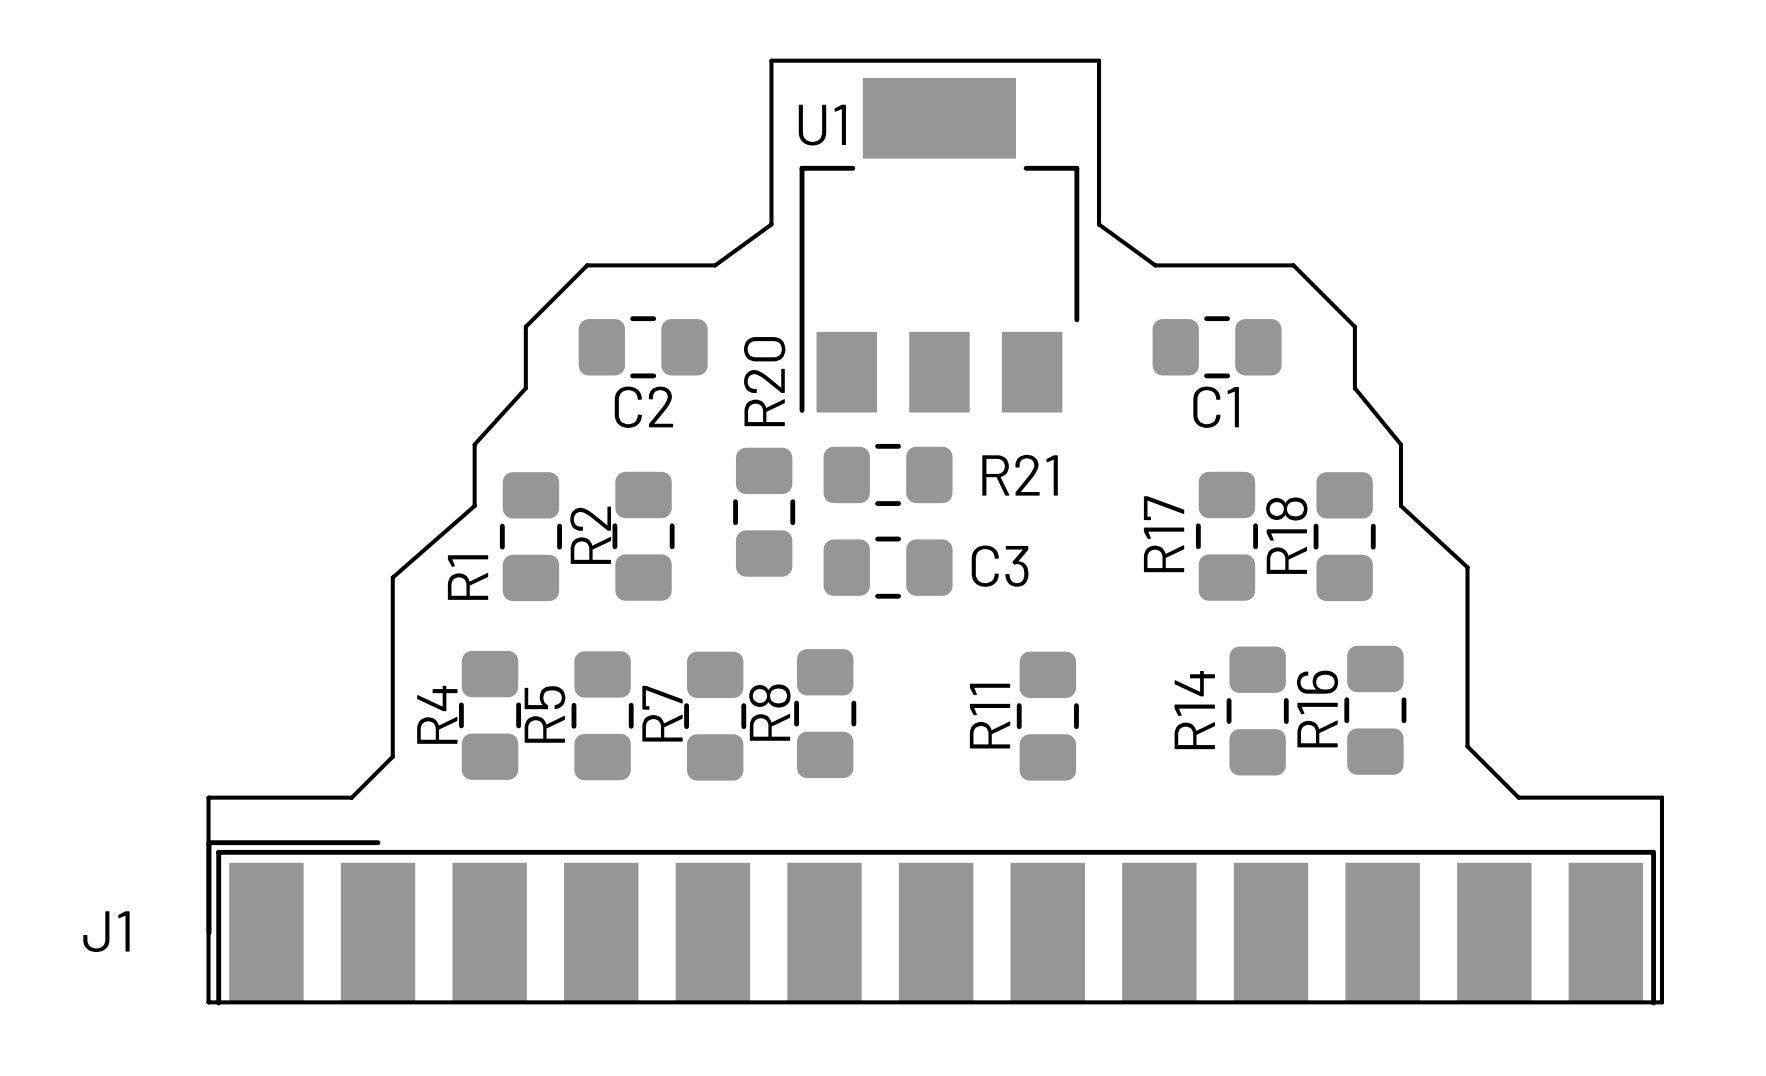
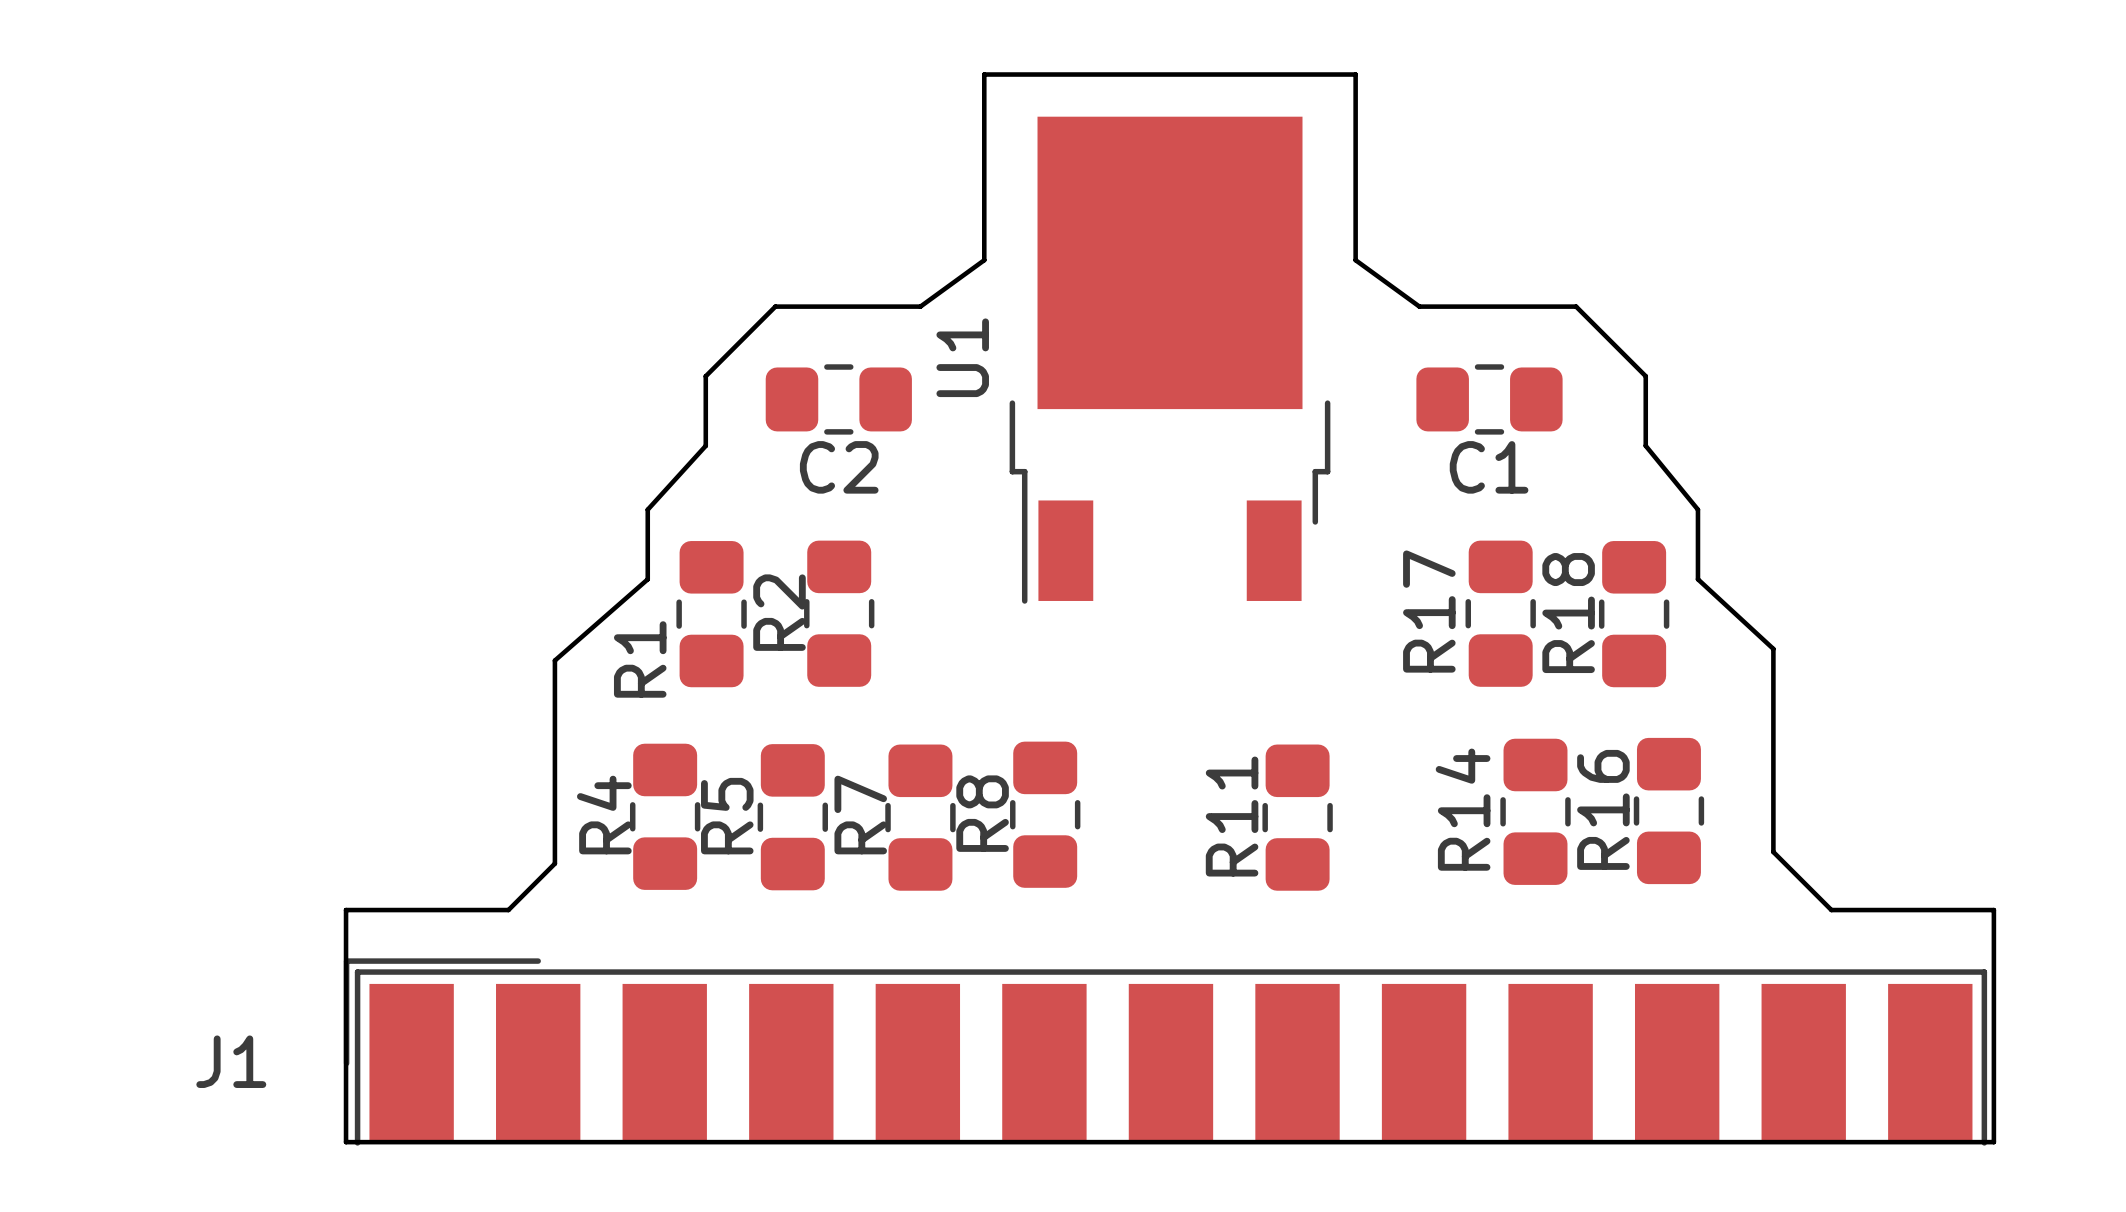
U1 footprint: [799, 78, 1080, 413] -> [1009, 116, 1331, 604]
U1 name position: U1 (822, 125) -> U1 (962, 357)
R21: (888, 474) -> none
R20: (764, 512) -> none
C3: (888, 567) -> none

